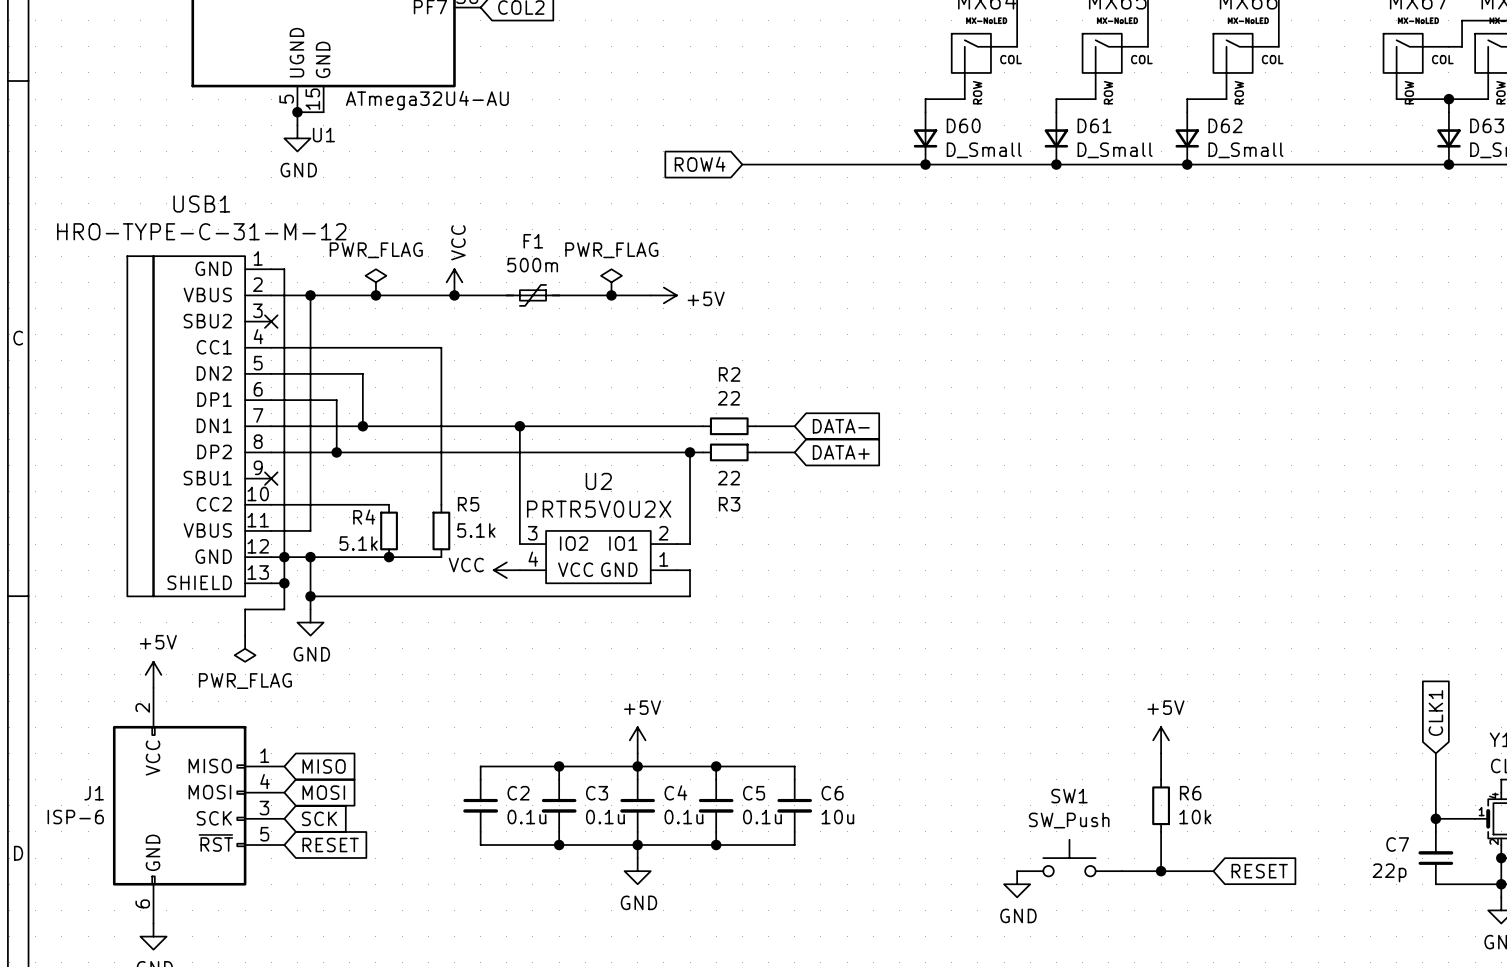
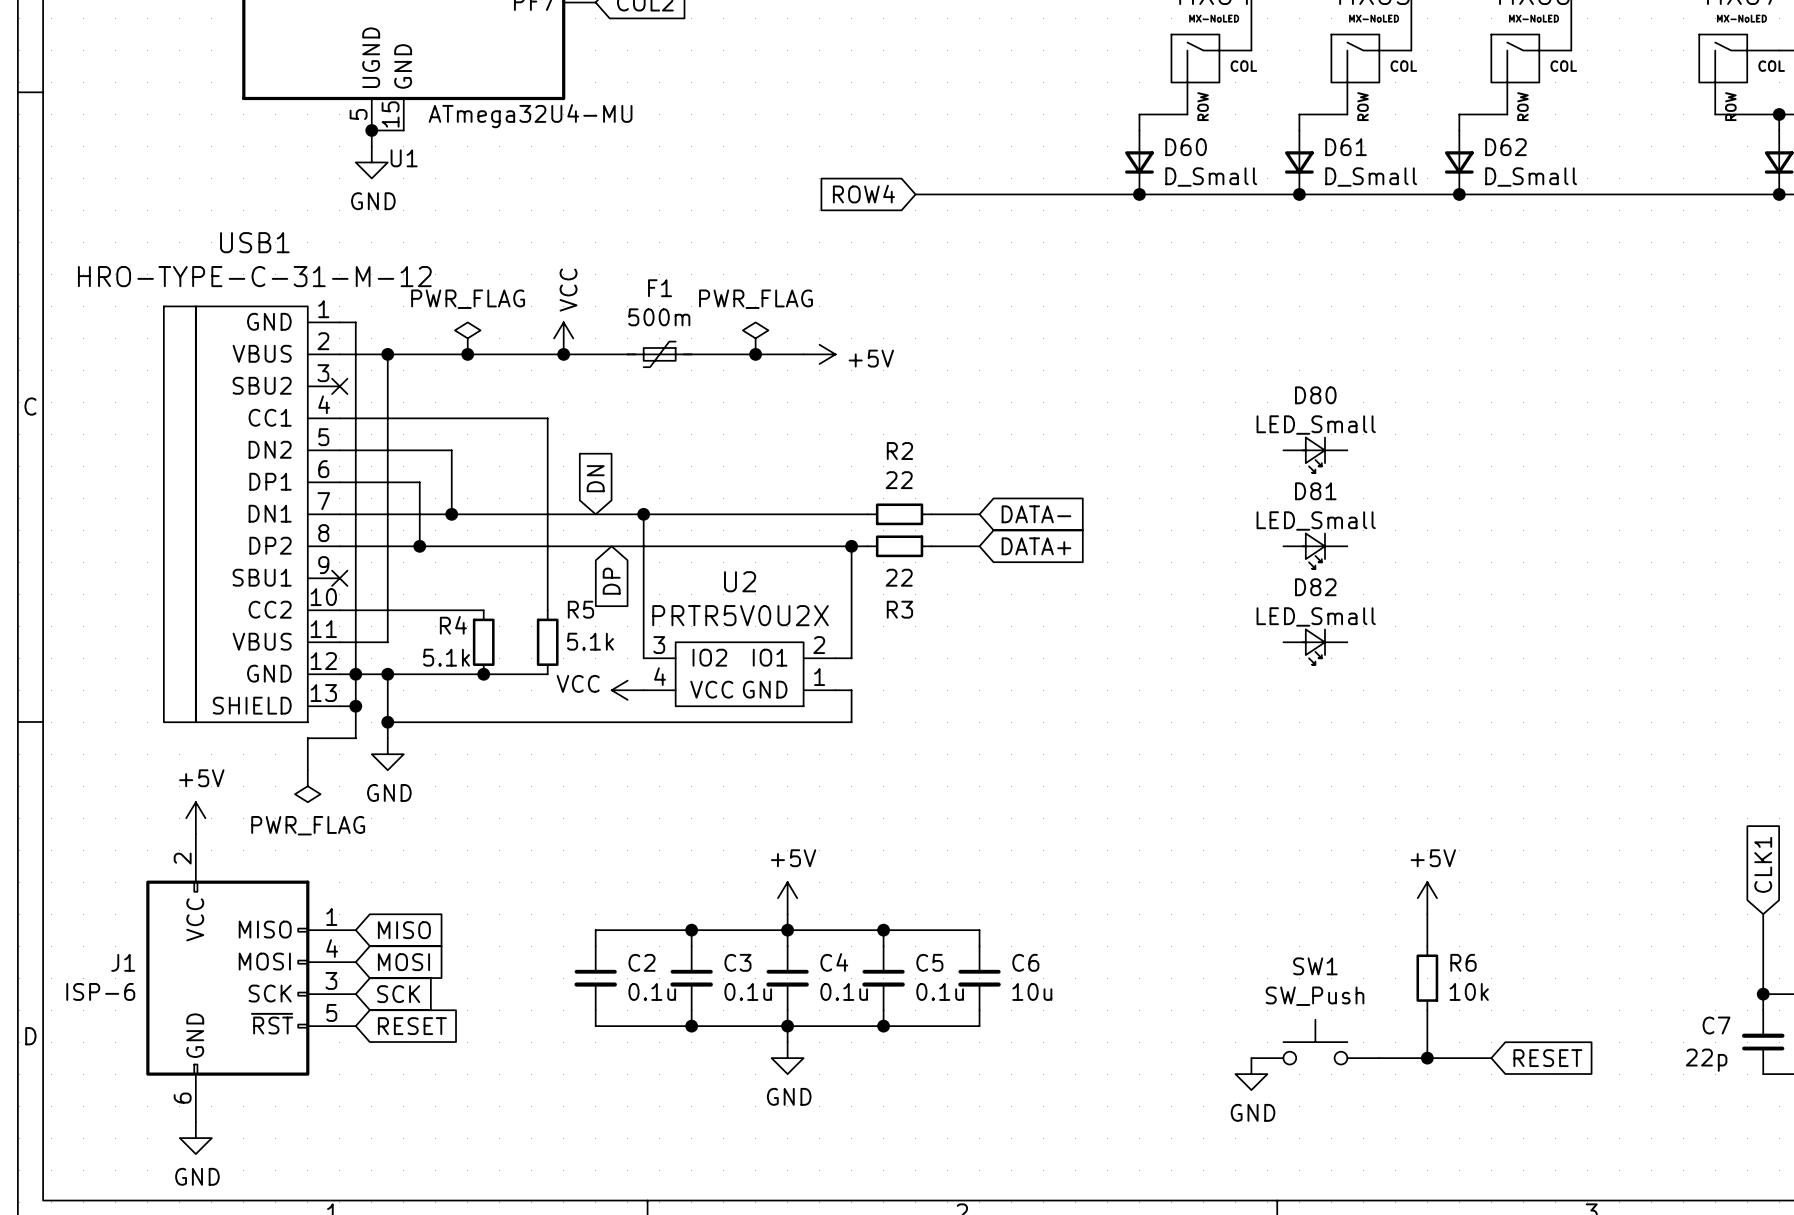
U1 value: ATmega32U4-AU (427, 100) -> ATmega32U4-MU (530, 116)
D80: none -> LED_Small (1315, 455)
global label: none -> DN (595, 478)
D81: none -> LED_Small (1315, 551)
global label: none -> DP (611, 581)
D82: none -> LED_Small (1315, 647)

